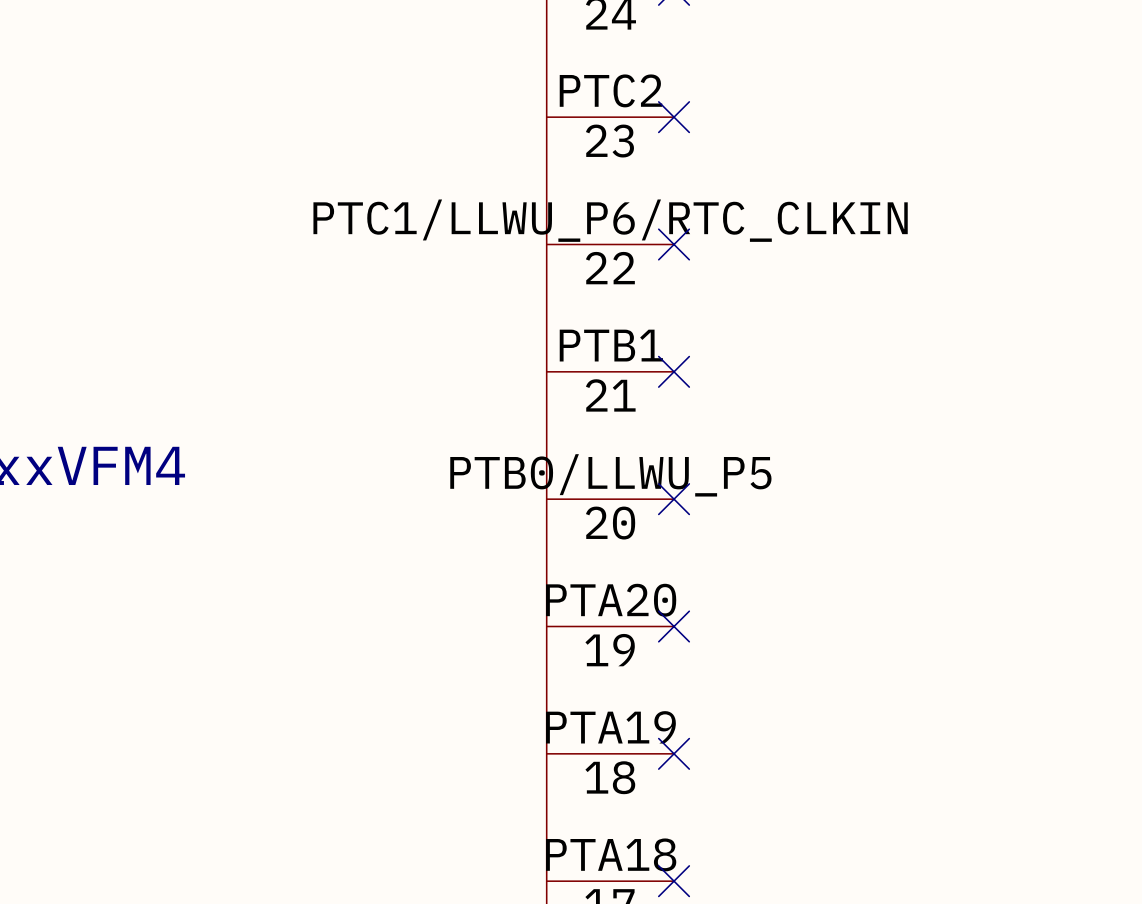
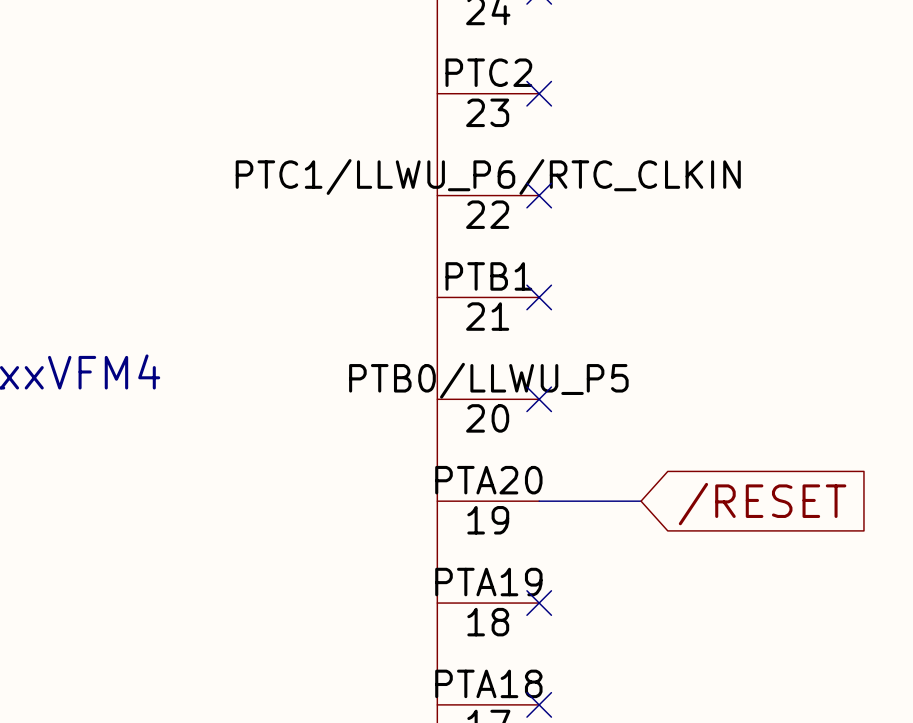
wire: none -> (539, 501) (641, 501)
no-connect mark: (674, 626) -> none
global label: none -> /RESET (762, 504)

